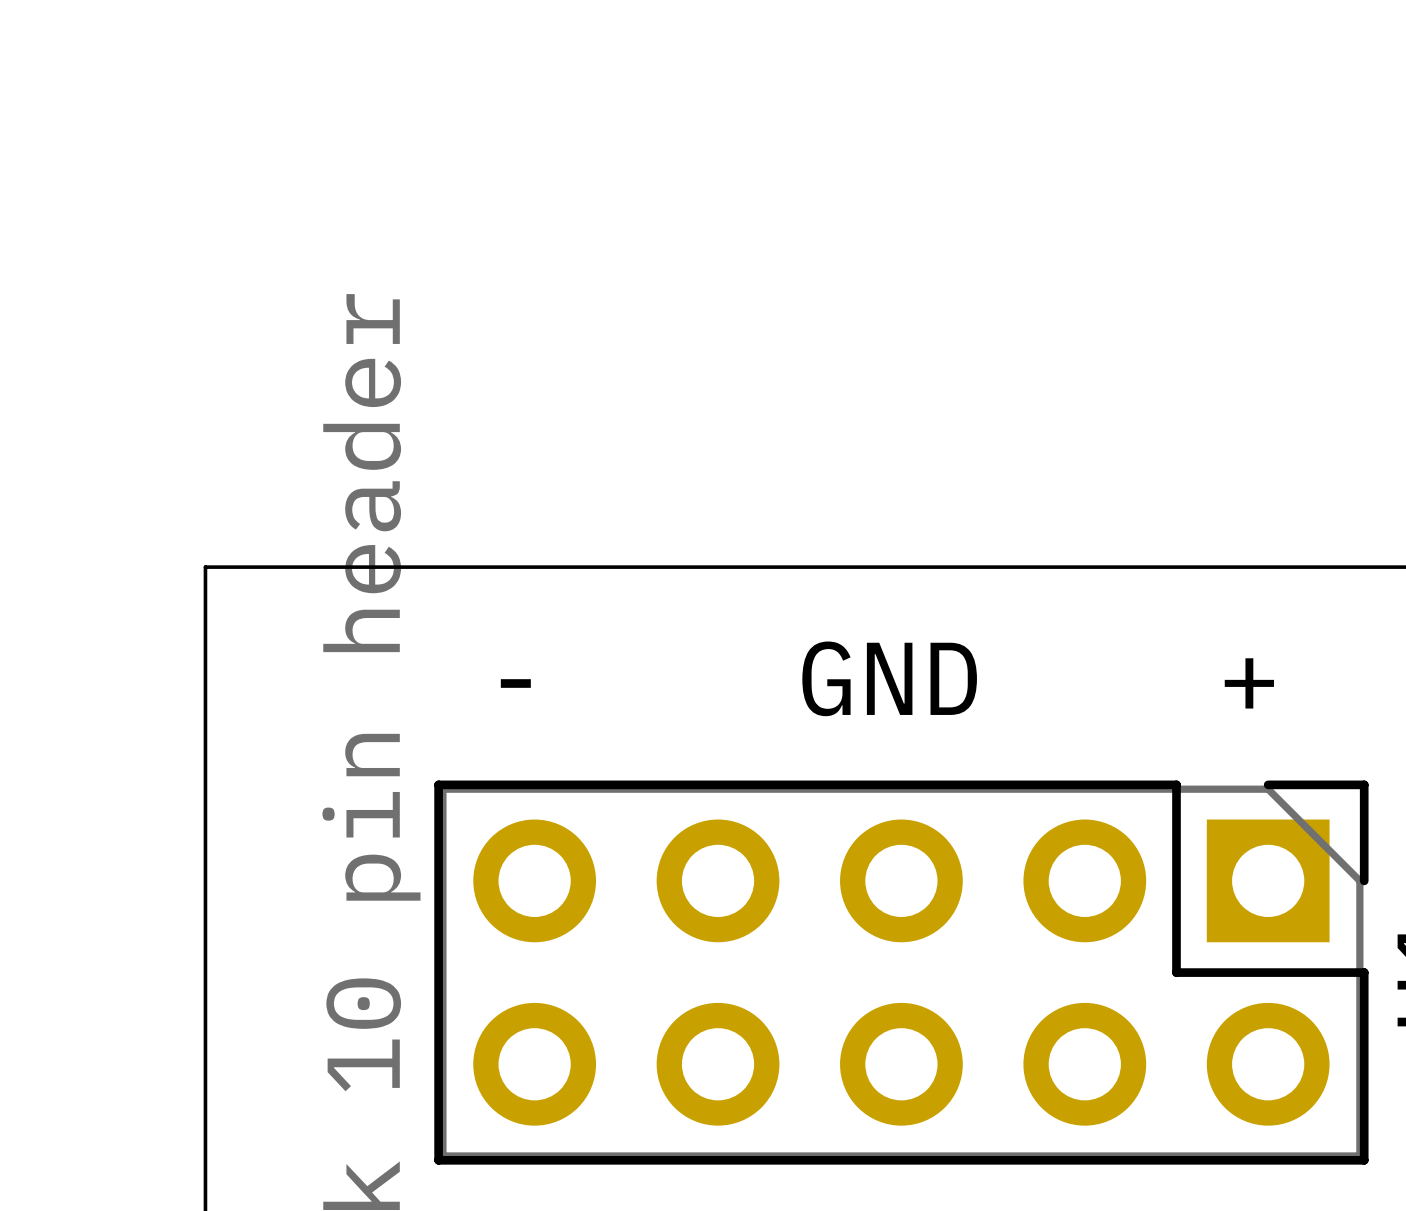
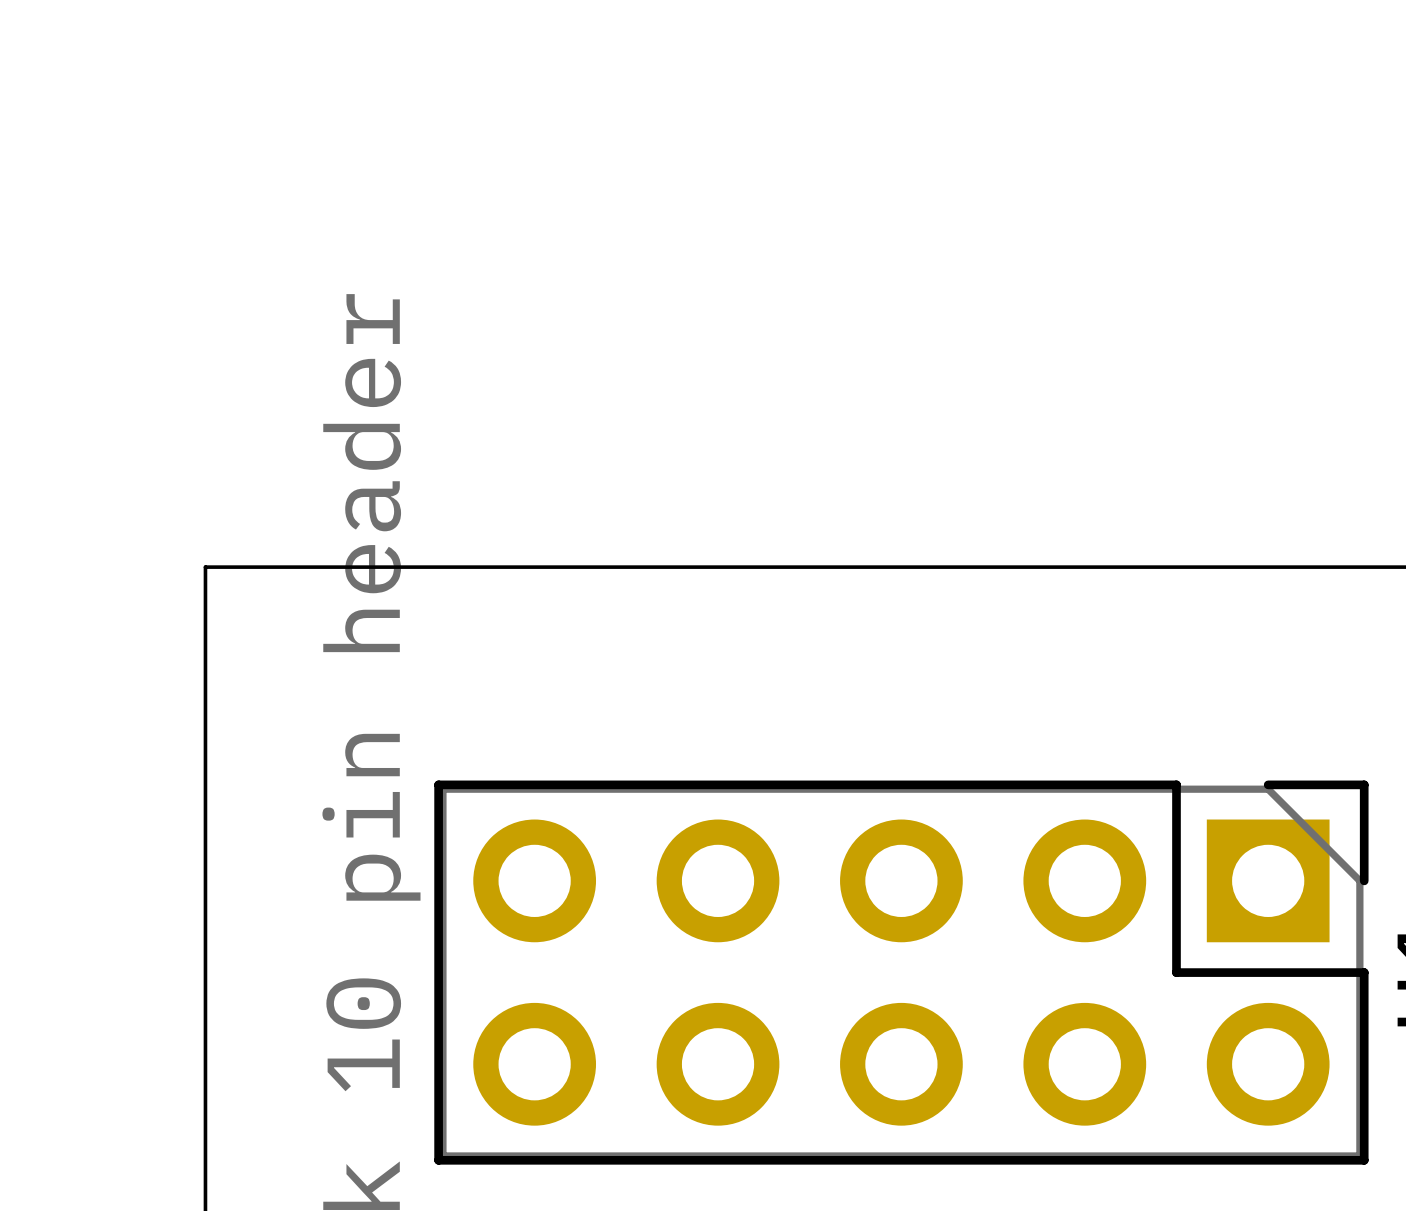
text: GND (889, 678) -> none
text: - (515, 683) -> none
text: + (1249, 683) -> none

